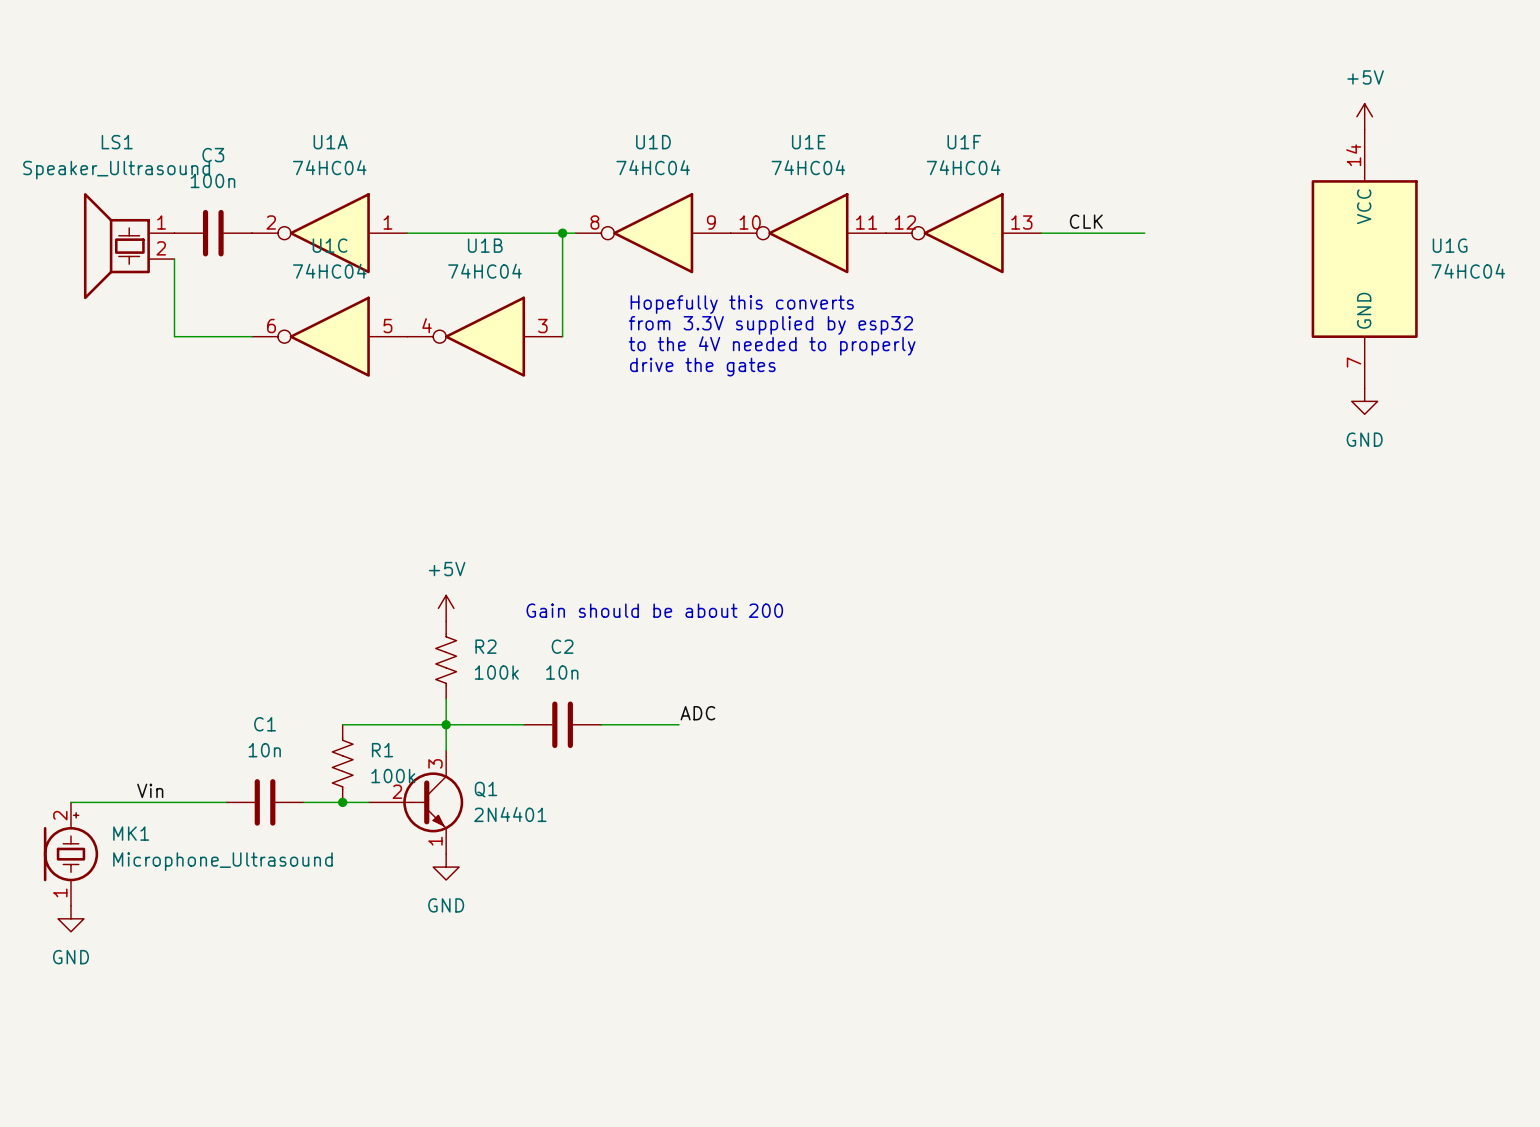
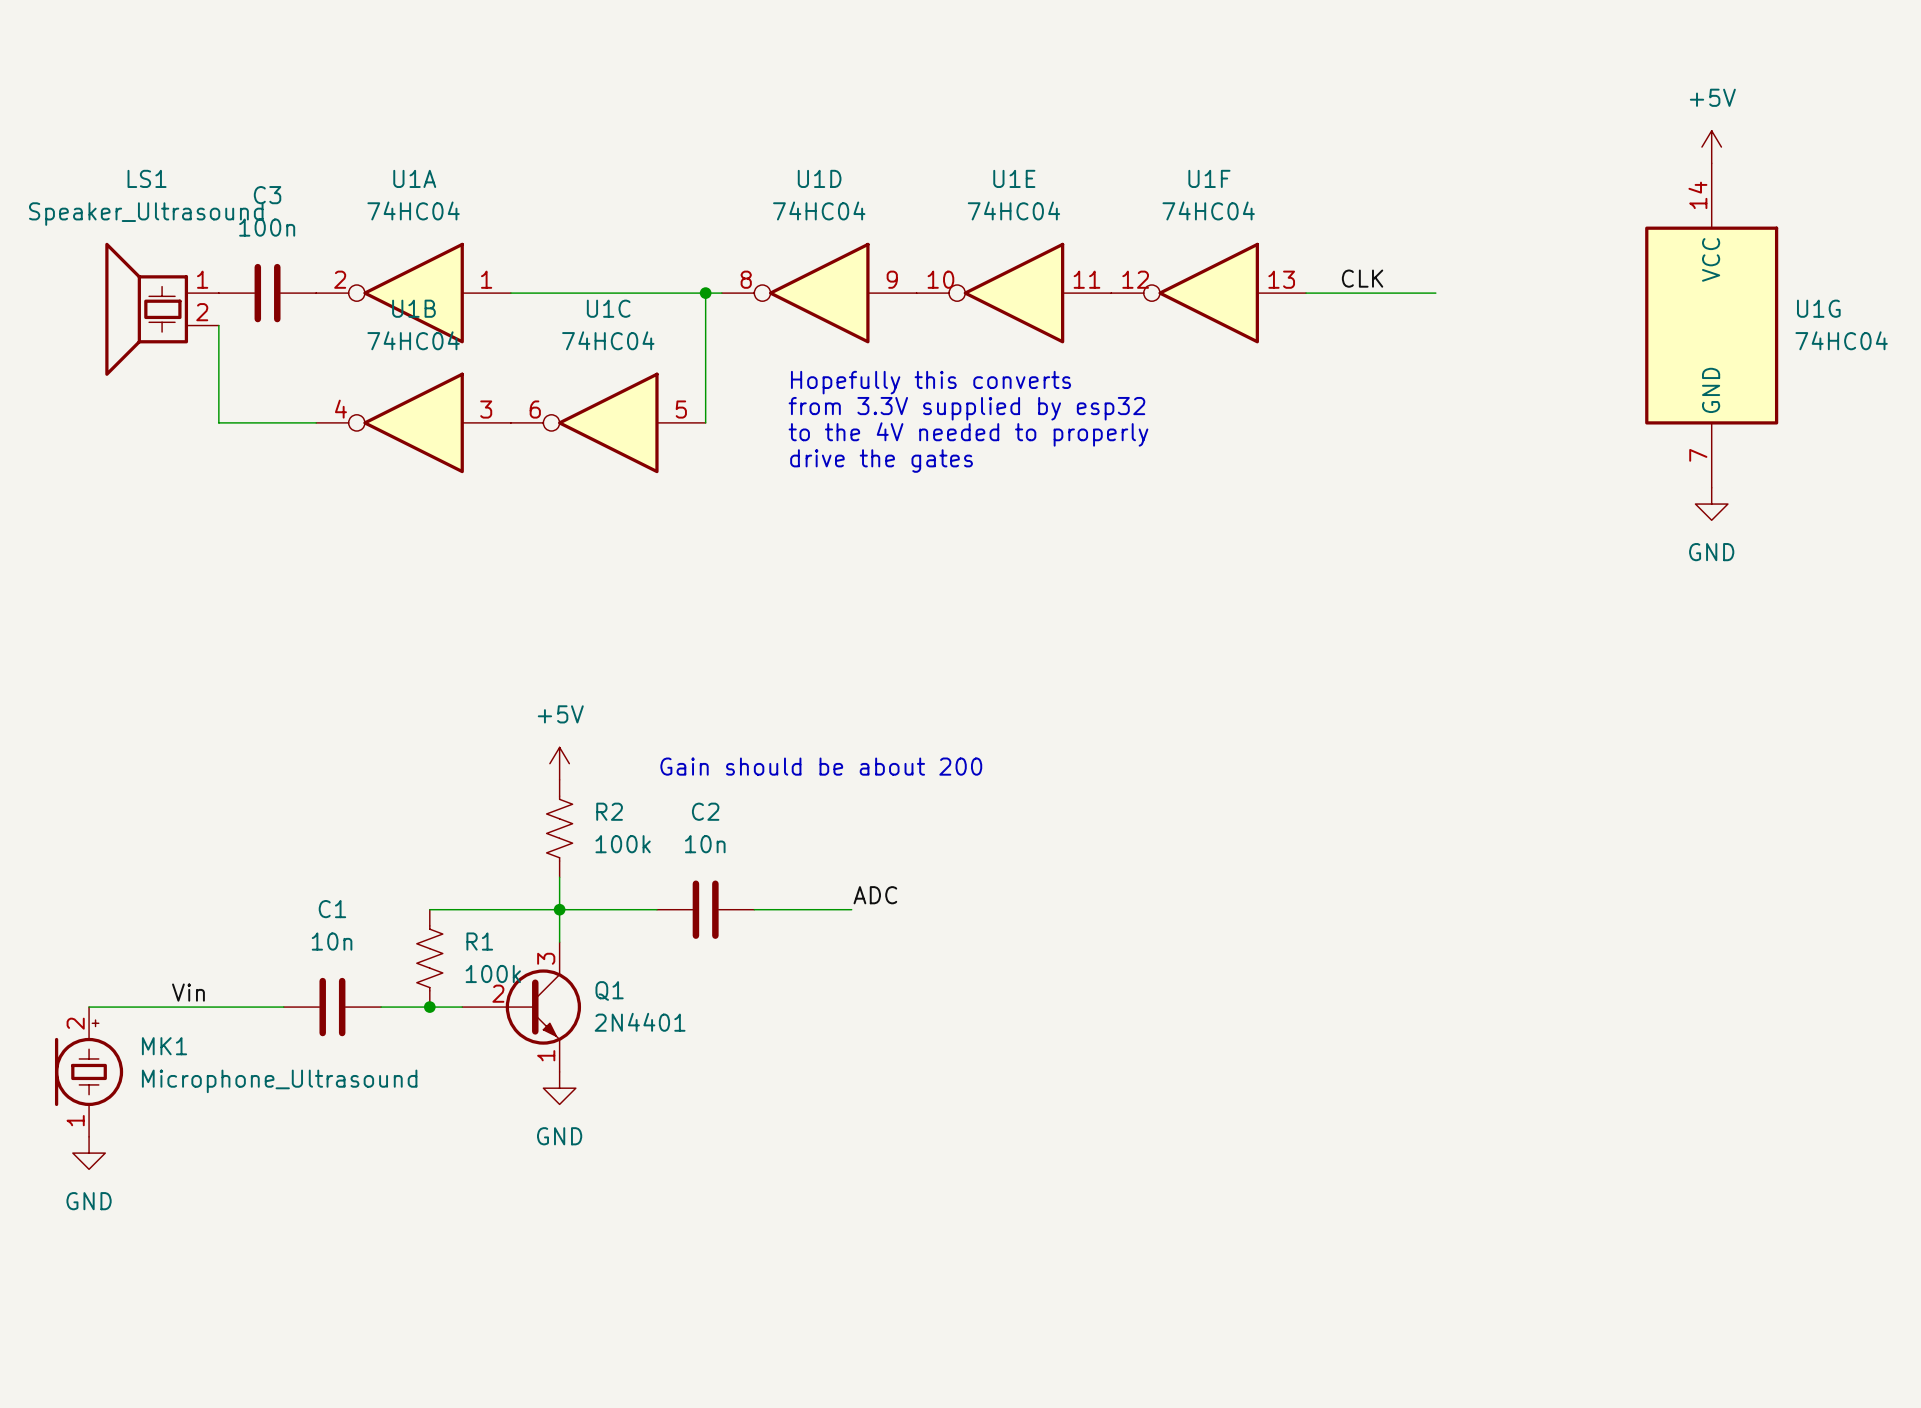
U1C position: (329, 336) -> (608, 422)
U1B position: (484, 336) -> (413, 422)

